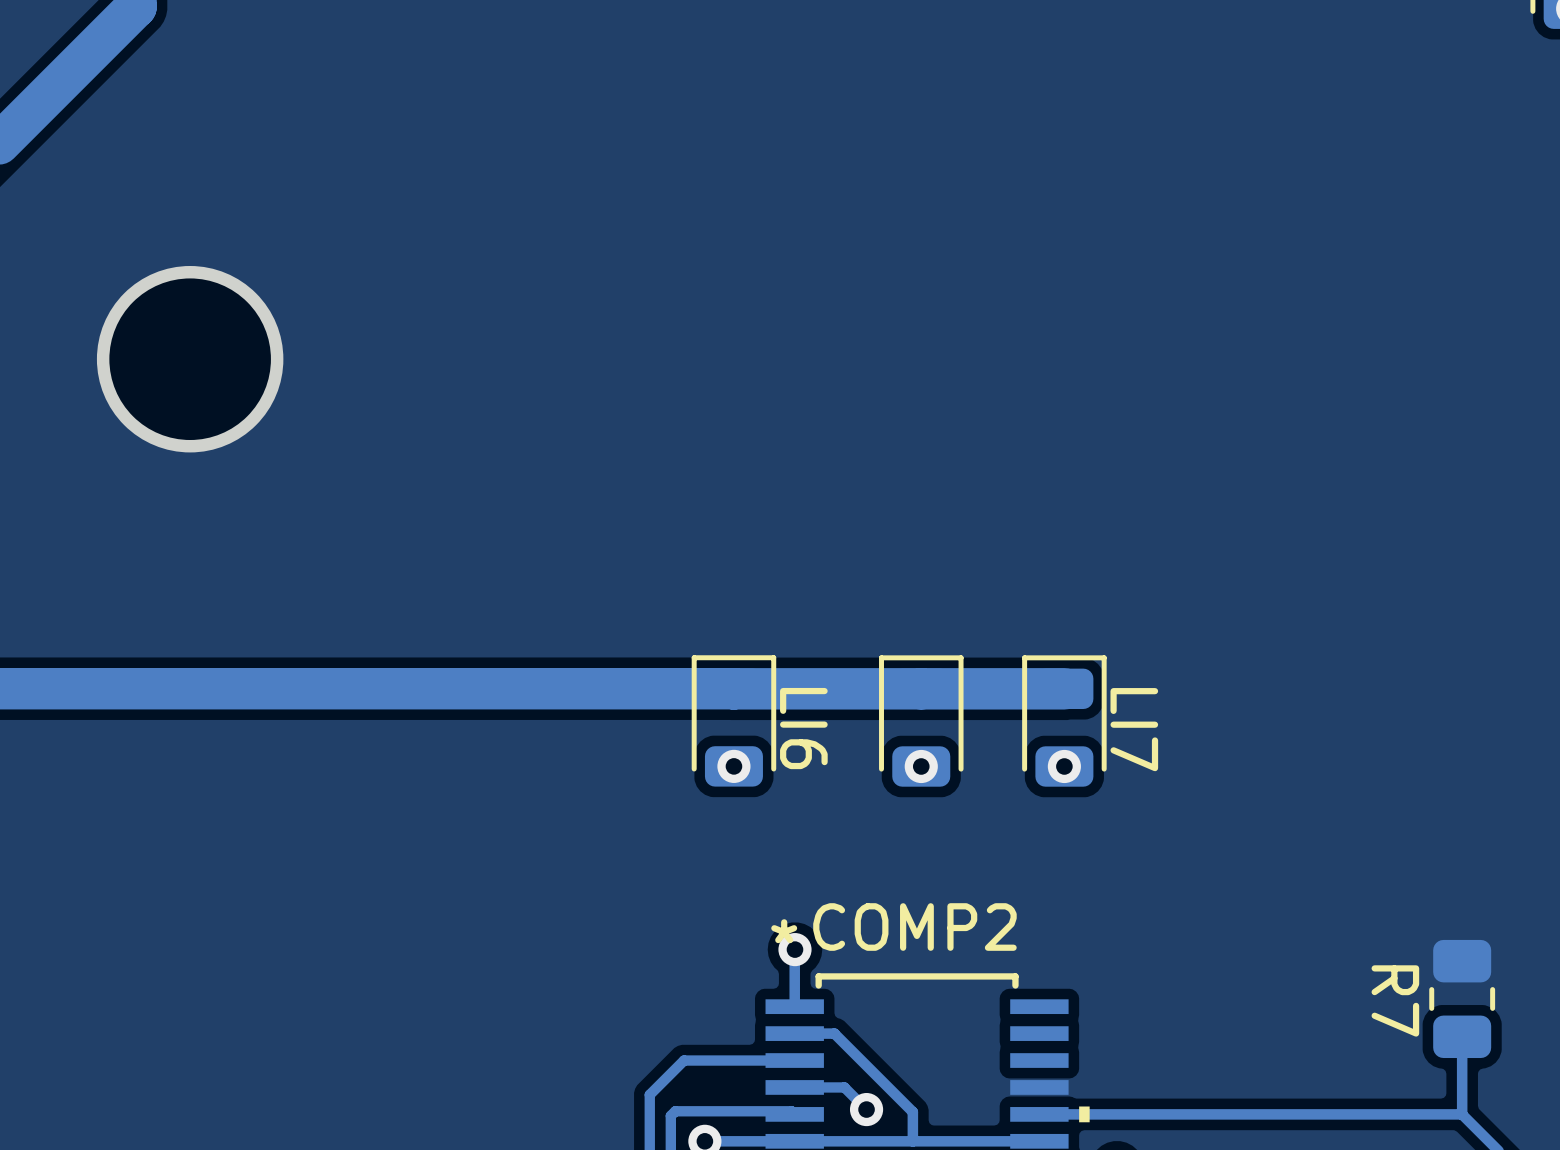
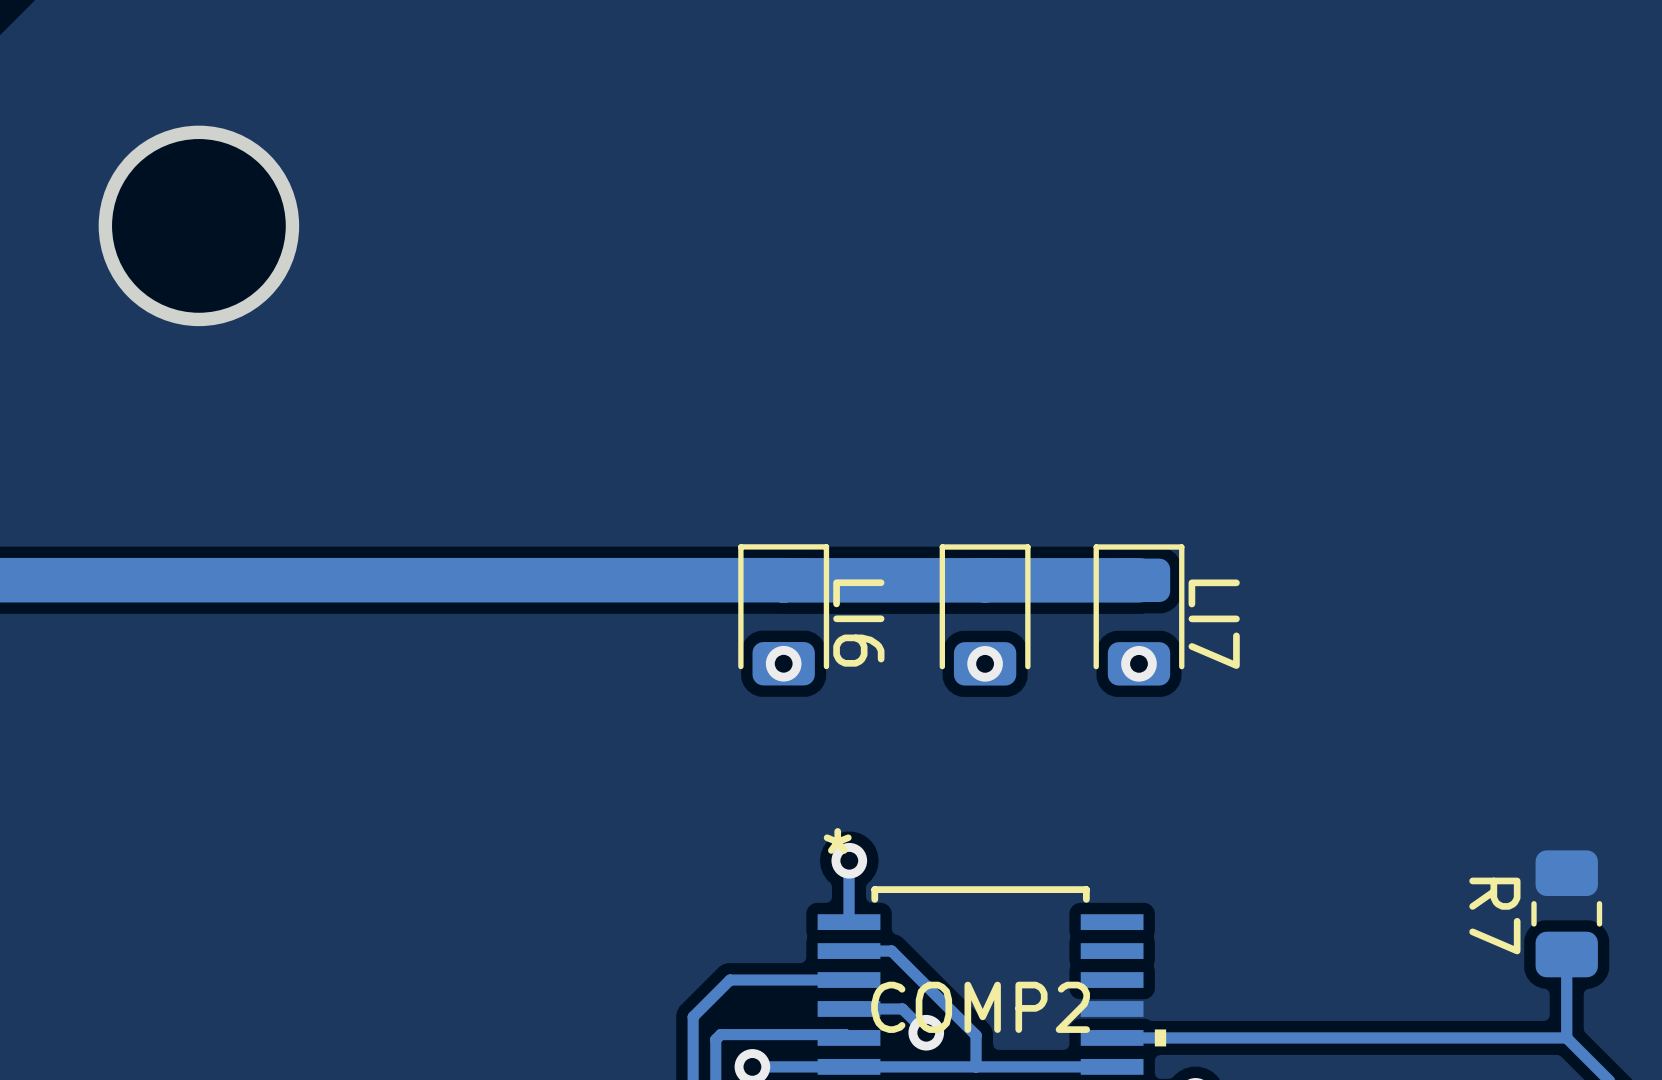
COMP2 name position: COMP2 (914, 927) -> COMP2 (980, 1007)

